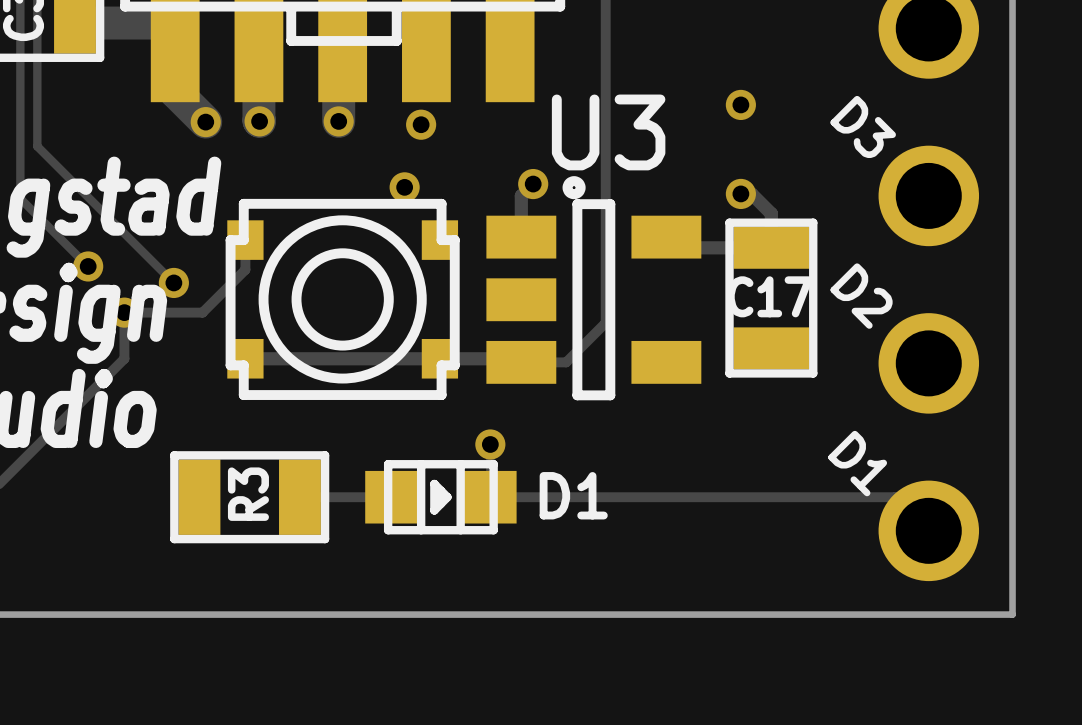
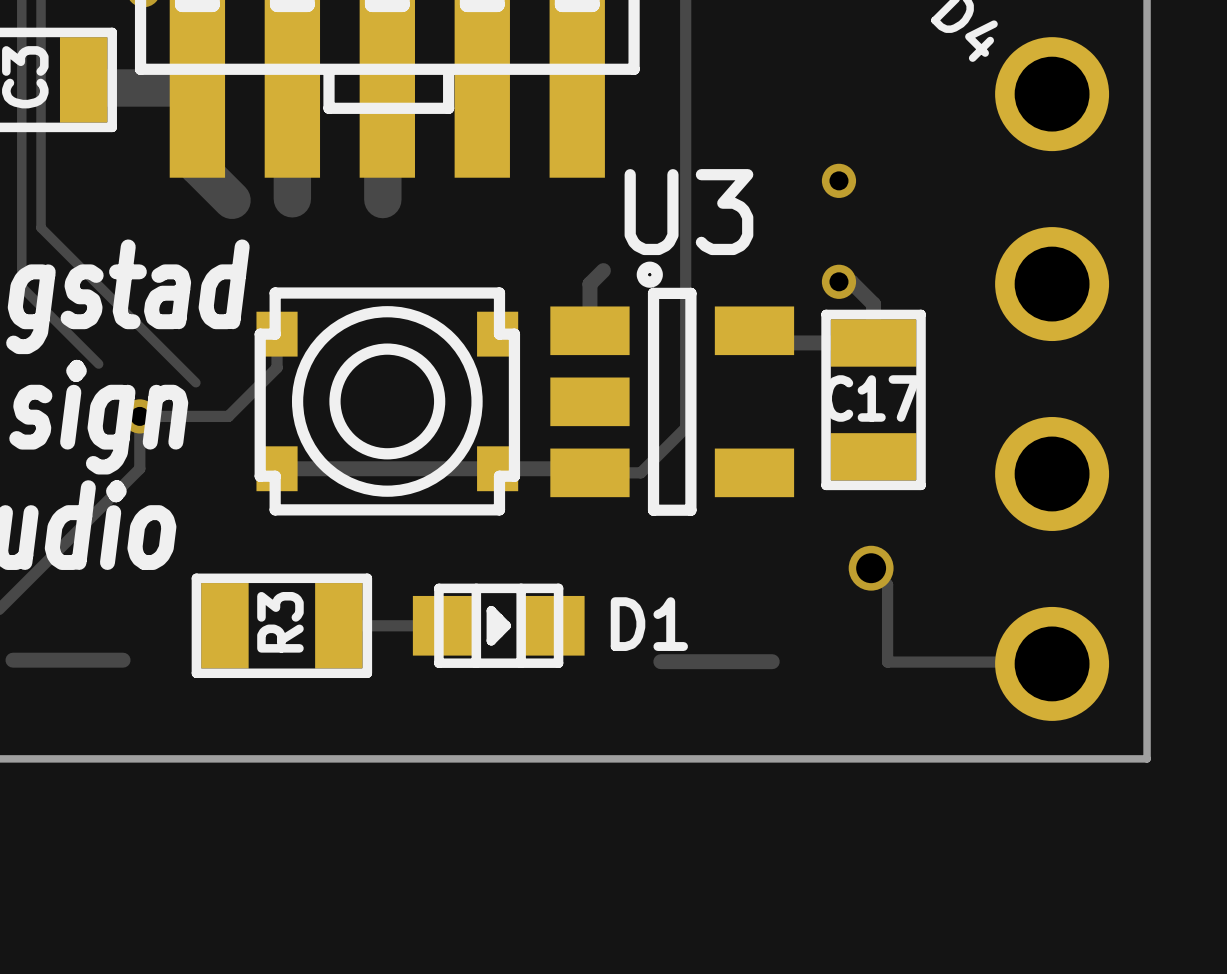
via: (259, 121) -> none
via: (338, 121) -> none
via: (205, 122) -> none
via: (421, 124) -> none
text: D3 (863, 126) -> none
via: (533, 184) -> none
via: (404, 187) -> none
via: (88, 266) -> none
via: (173, 282) -> none
text: D2 (861, 296) -> none
track: (490, 444) (490, 497) (895, 497) (927, 529) -> (871, 568) (887, 584) (887, 662) (1050, 662)
via: (490, 444) -> none
via: none -> (871, 568)
text: D1 (857, 463) -> none
track: none -> (12, 660) (123, 660)
track: none -> (660, 661) (772, 661)

